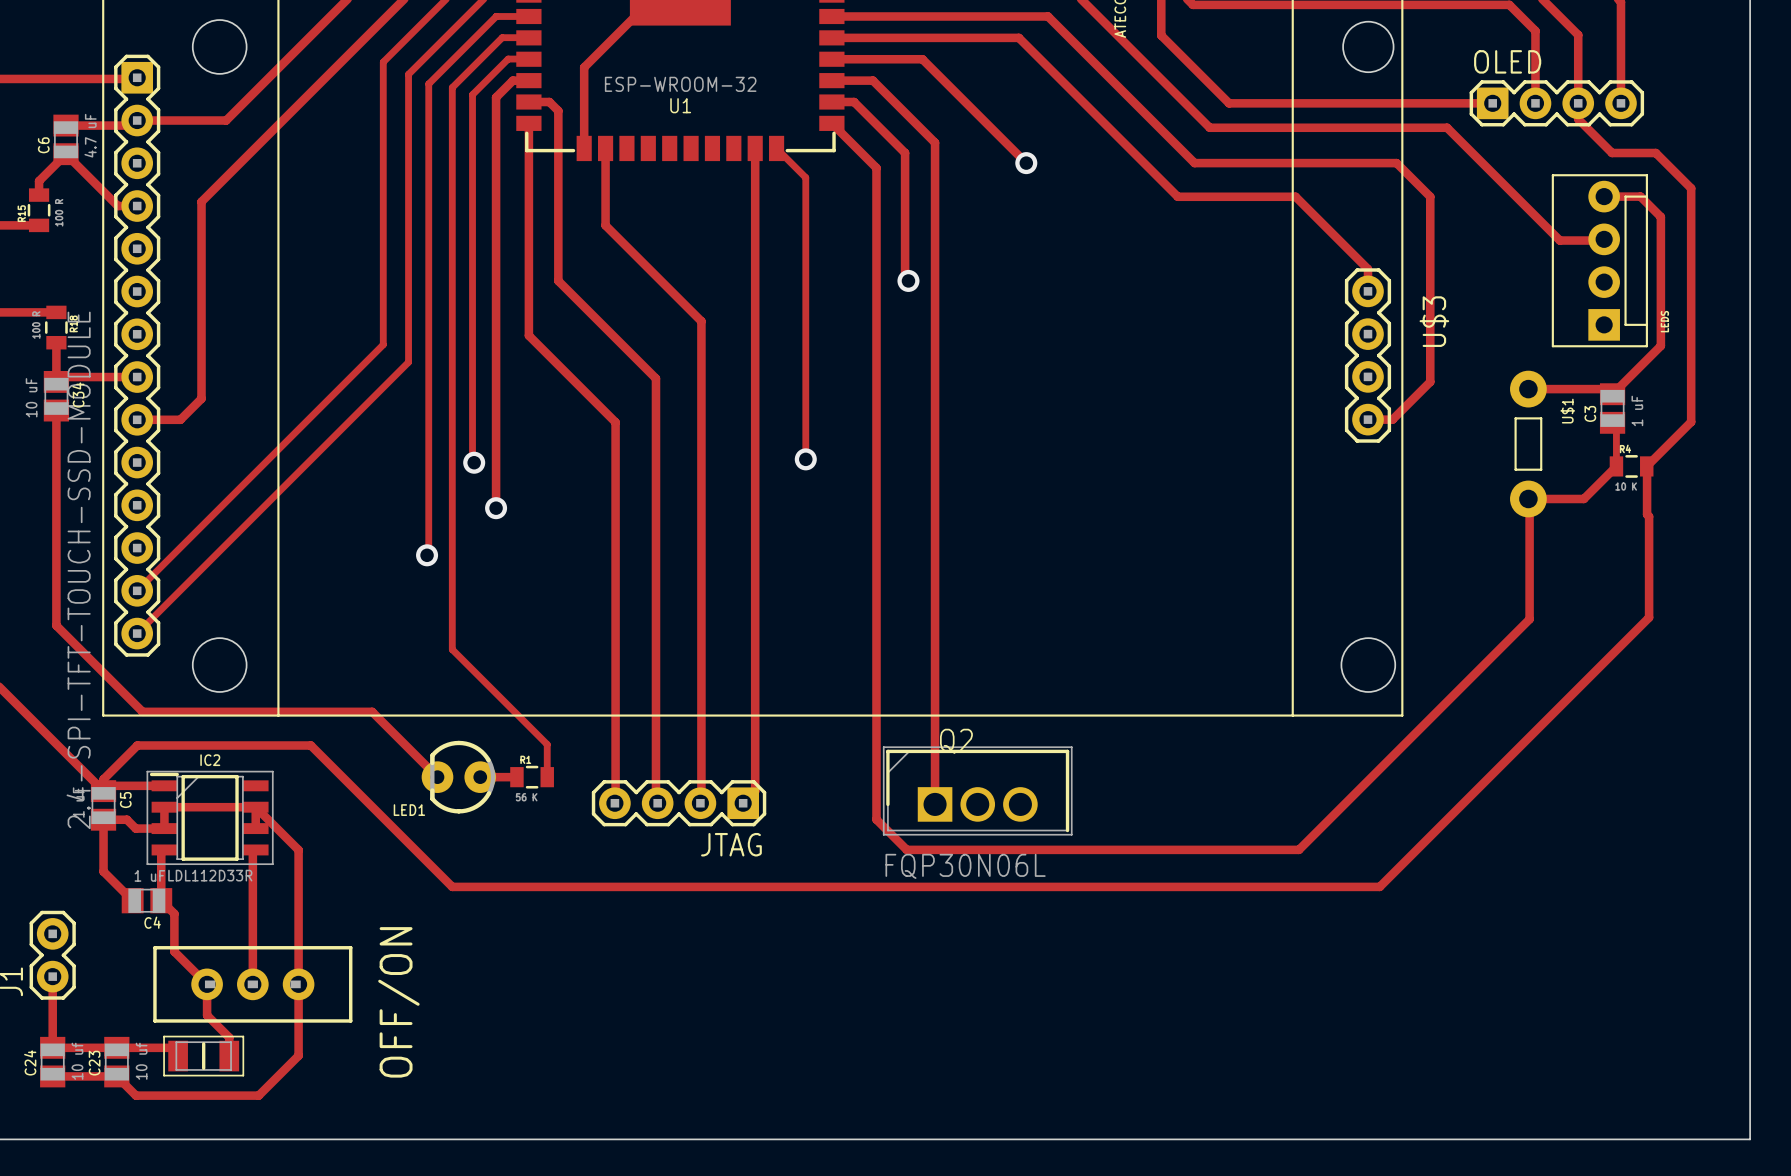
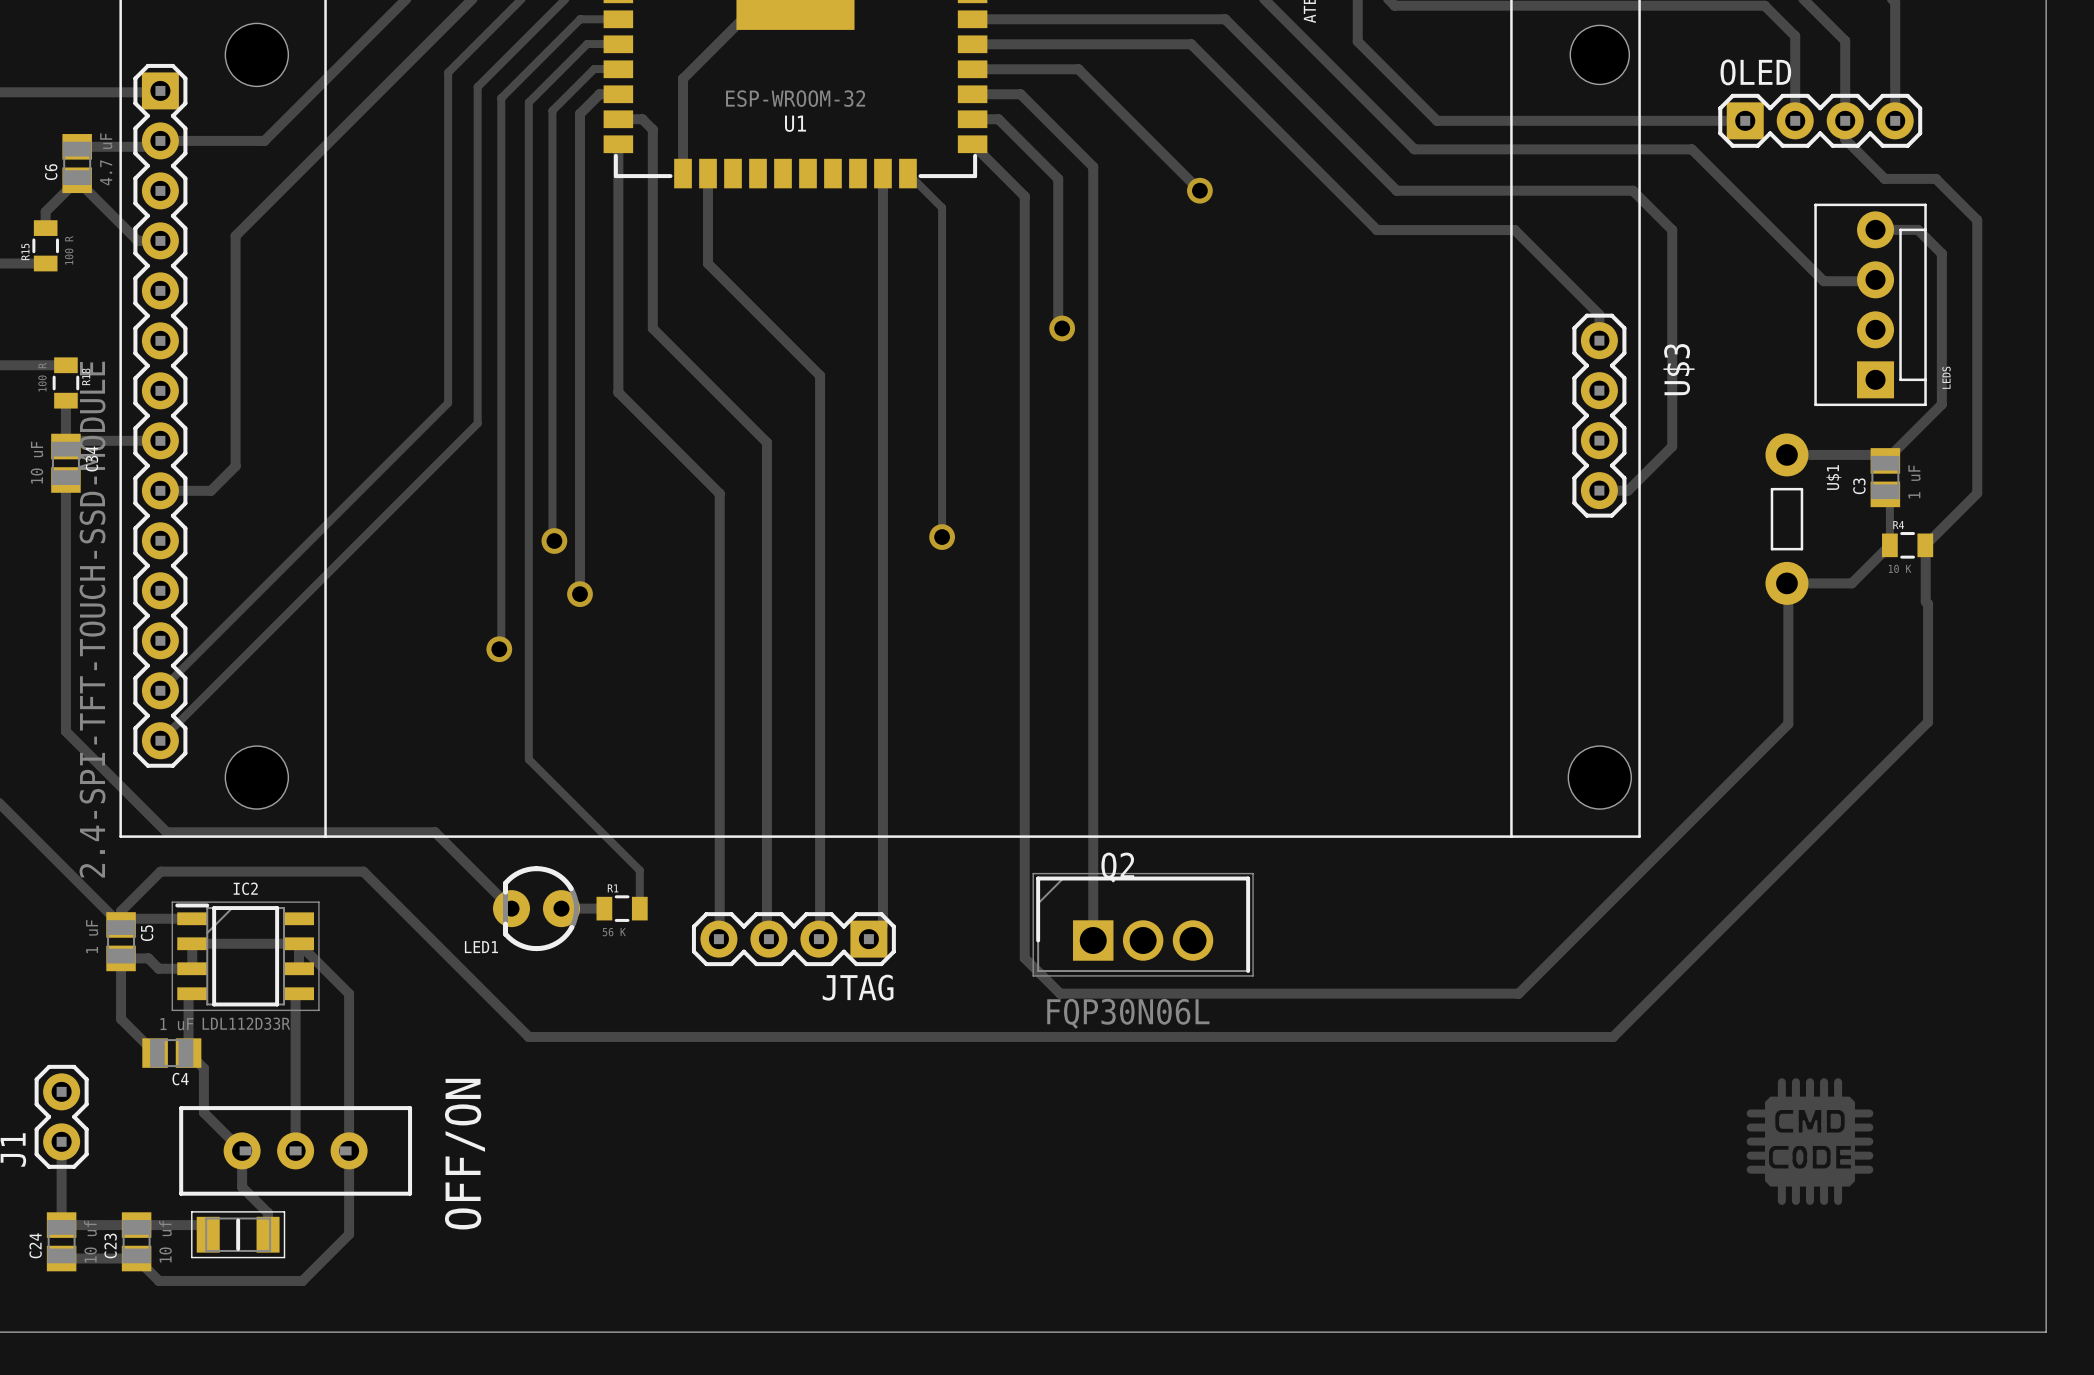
drawing: none -> [1746, 1078, 1874, 1205]

